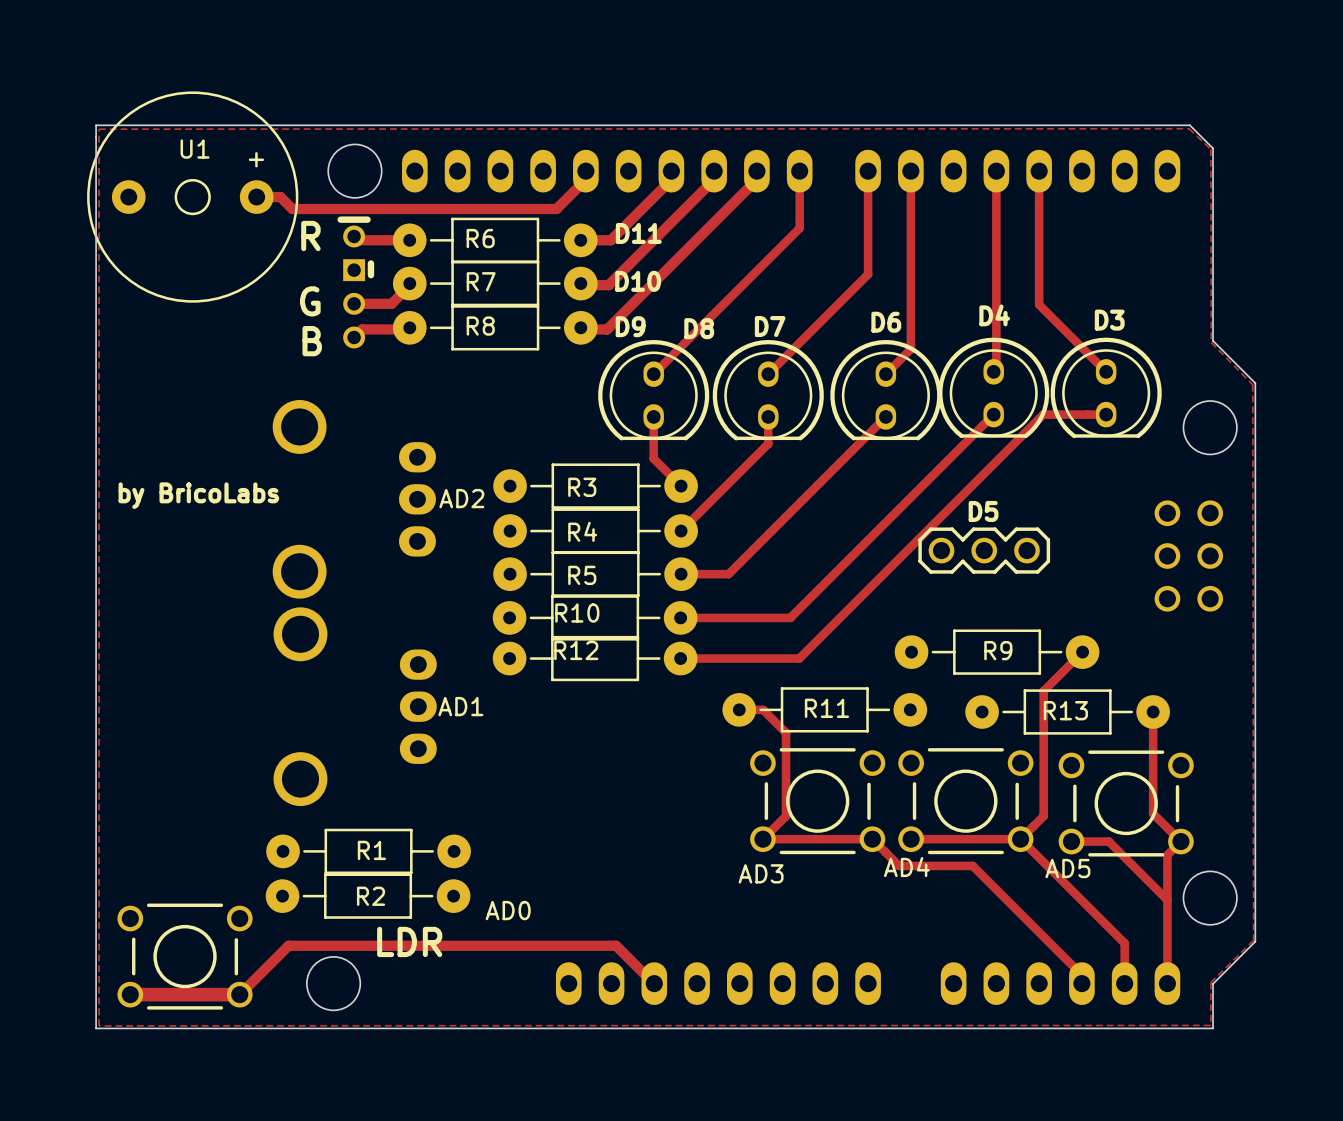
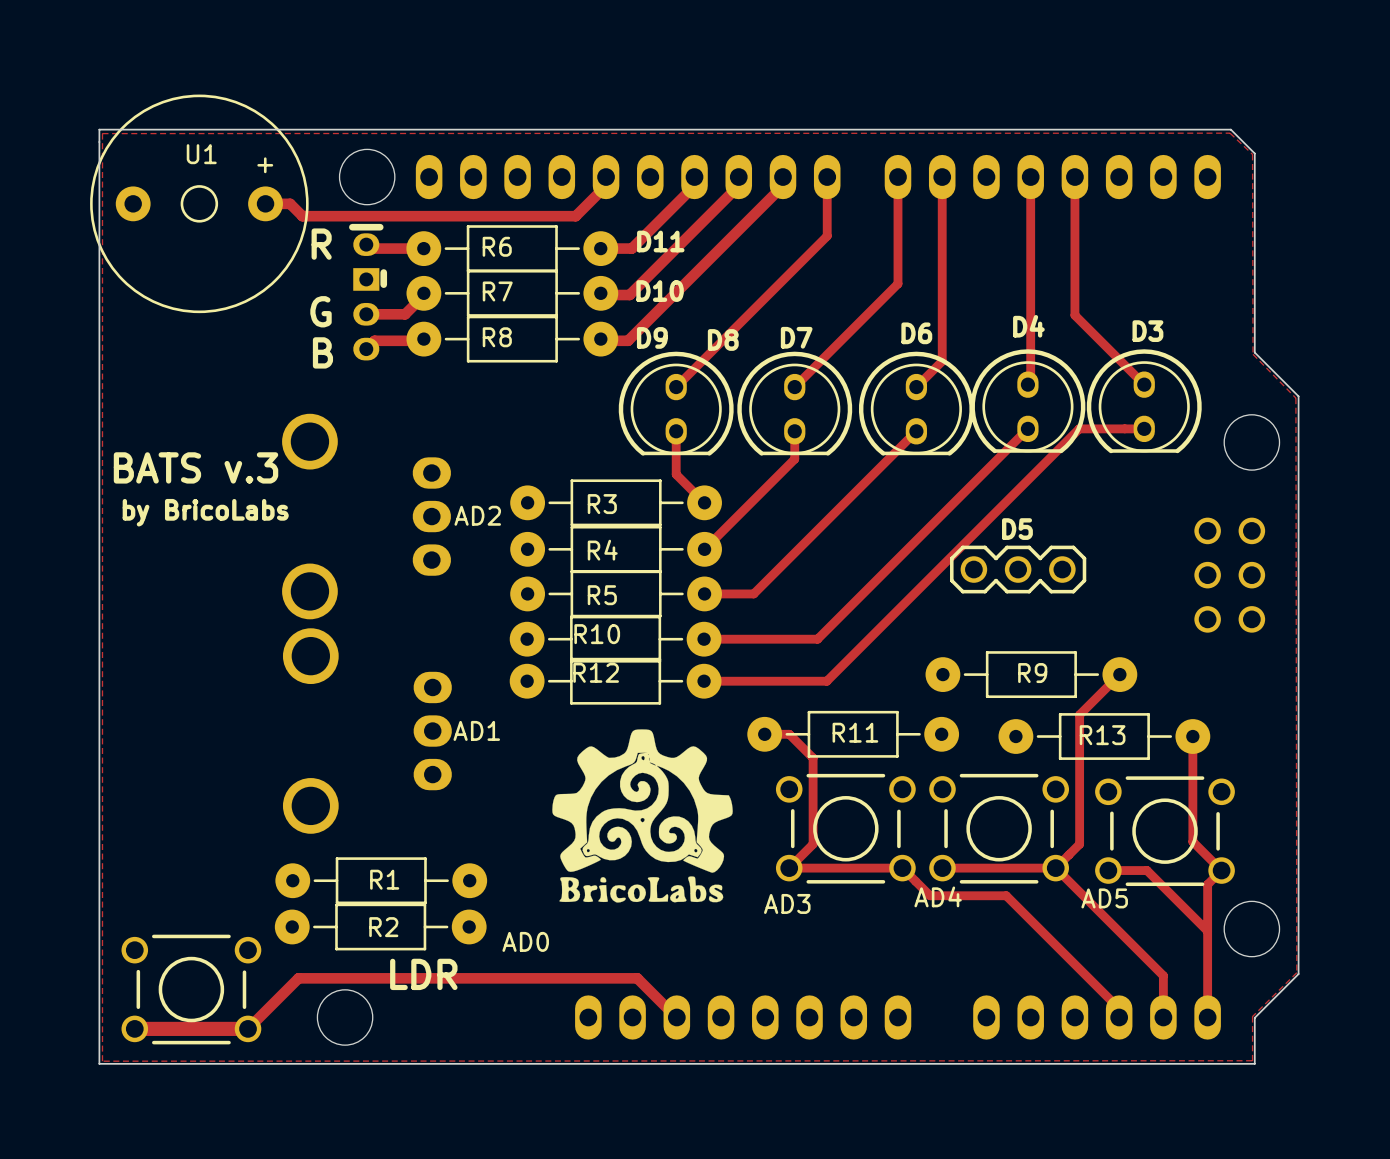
part footprint: [337, 216, 375, 349] -> [349, 223, 388, 361]
text: none -> BATS v.3 (196, 467)
drawing: none -> [552, 729, 733, 903]

